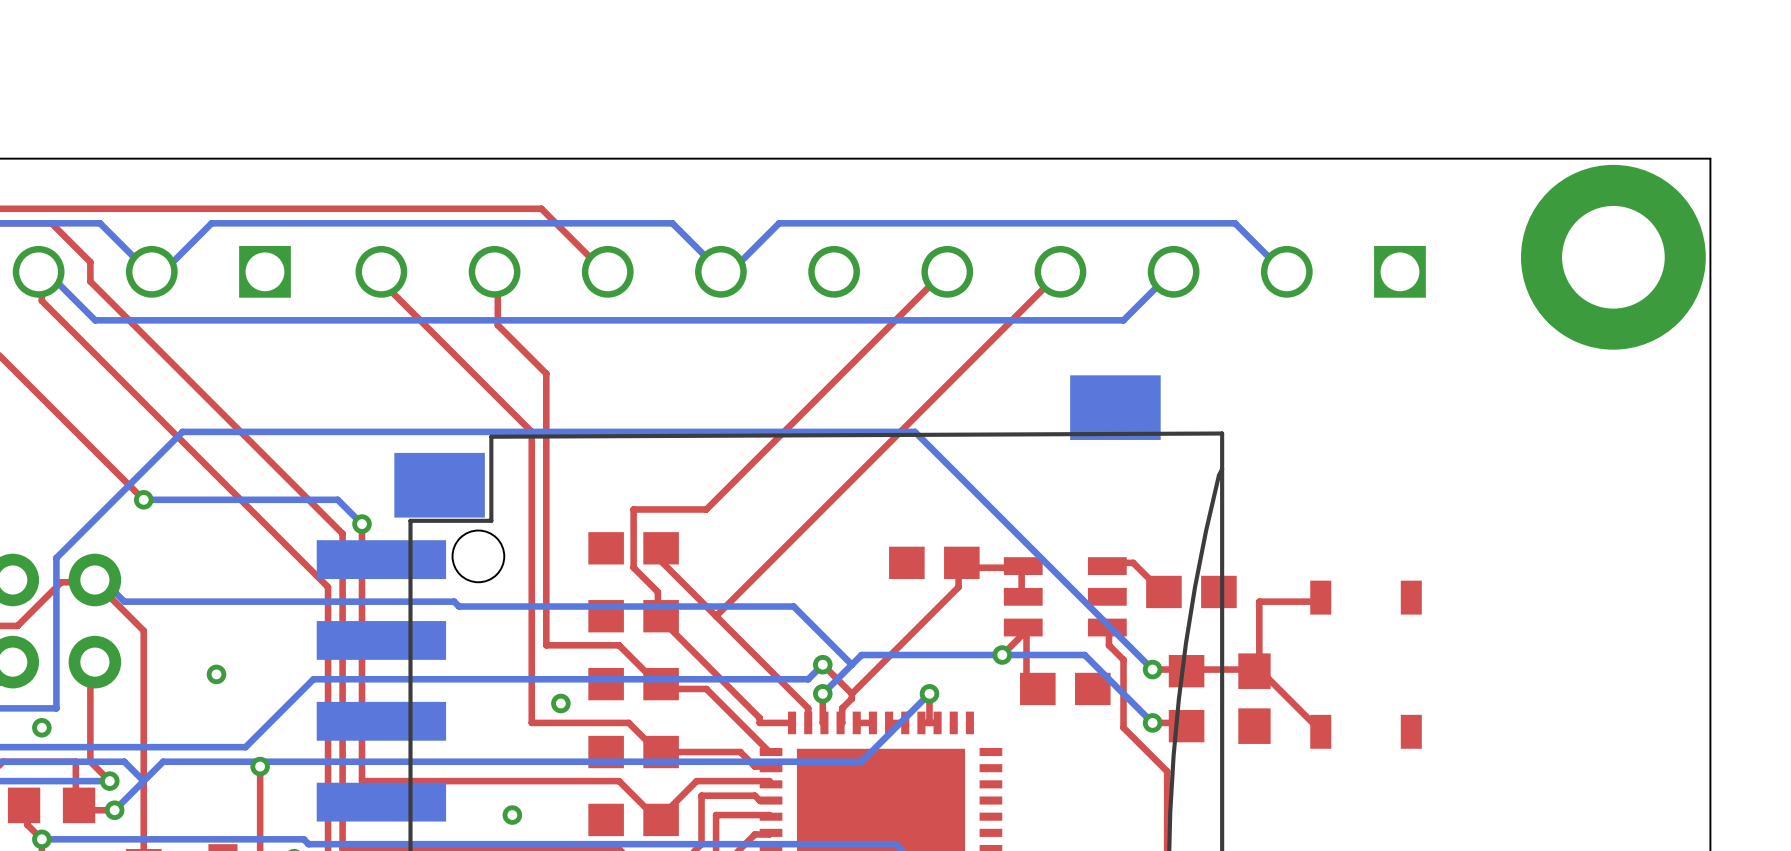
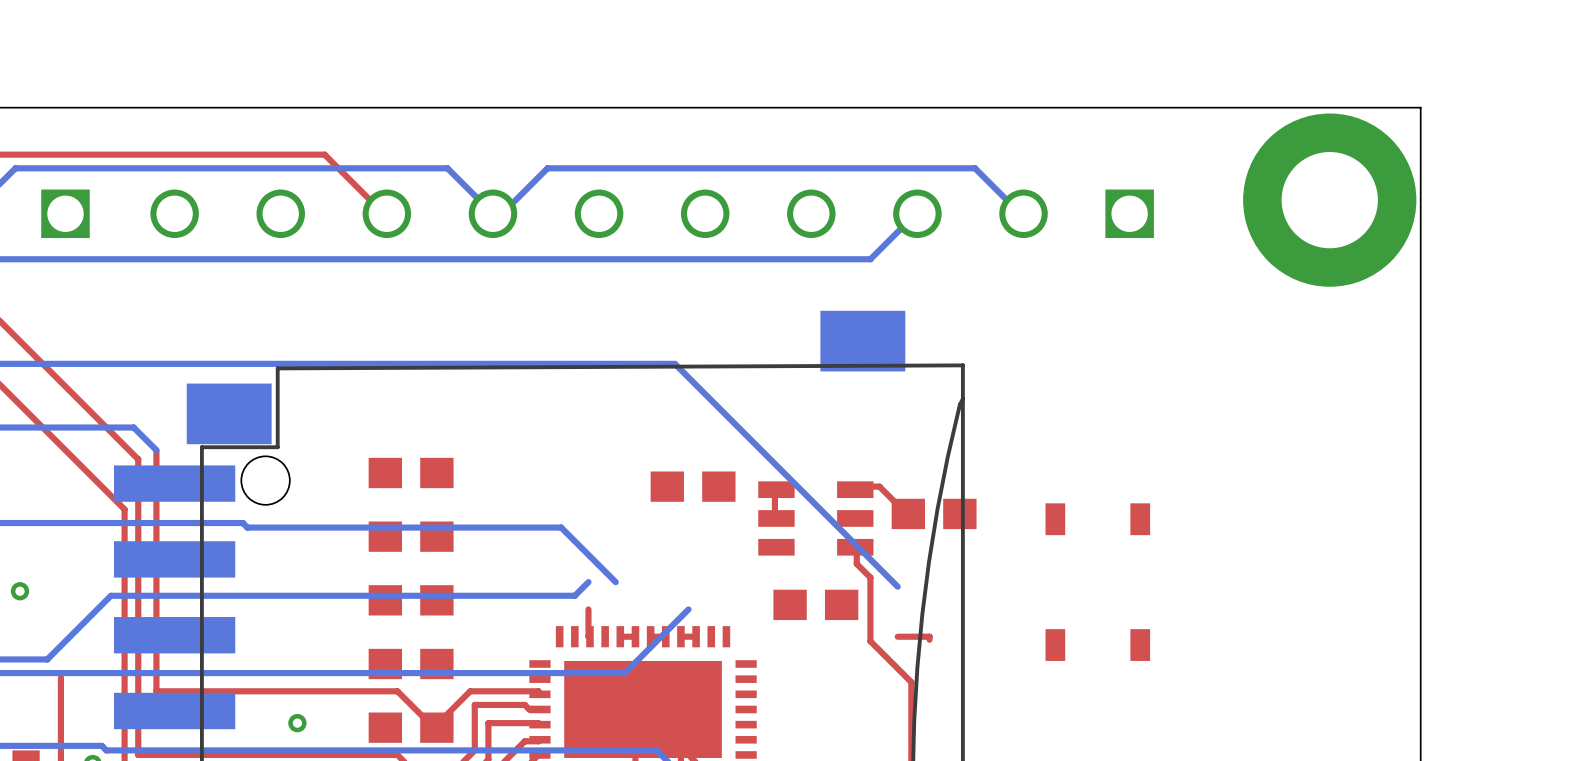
top track: (381, 271) (381, 281) (531, 431) (531, 722) (628, 722) (657, 752) (740, 752) (754, 766) (771, 768) -> none
top track: (494, 271) (497, 271) (497, 325) (546, 373) (546, 645) (619, 645) (657, 684) (662, 684) (662, 688) (706, 688) (771, 752) -> none
top track: (947, 271) (944, 271) (706, 509) (633, 509) (633, 567) (657, 591) (657, 616) (662, 616) (662, 621) (759, 718) (759, 722) (792, 722) -> none
top track: (1060, 271) (716, 616) -> none
via: (361, 524) -> none
top track: (661, 548) (662, 548) (662, 562) (808, 708) (808, 722) -> none
top track: (1023, 566) (1021, 567) (963, 567) (963, 562) (958, 562) (958, 587) (851, 693) -> none
top track: (1320, 597) (1317, 601) (1259, 601) (1259, 674) (1254, 671) -> none
top track: (1002, 655) (1021, 635) (1023, 627) (1026, 630) (1026, 679) (1037, 688) -> none
via: (1002, 655) -> none
top track: (822, 664) (851, 693) -> none
via: (822, 664) -> none
top track: (1152, 669) (1254, 669) (1254, 674) (1264, 674) (1320, 731) -> none
via: (1152, 669) -> none
bottom track: (822, 693) (861, 655) (1084, 655) (1152, 722) -> none
via: (822, 693) -> none
top track: (851, 693) (851, 698) (842, 708) (842, 722) (840, 722) -> none
top track: (929, 693) (929, 722) -> none
via: (929, 693) -> none
part: (1186, 698) -> none
part: (1254, 698) -> none
via: (560, 703) -> none
via: (1152, 722) -> none
via: (260, 766) -> none

